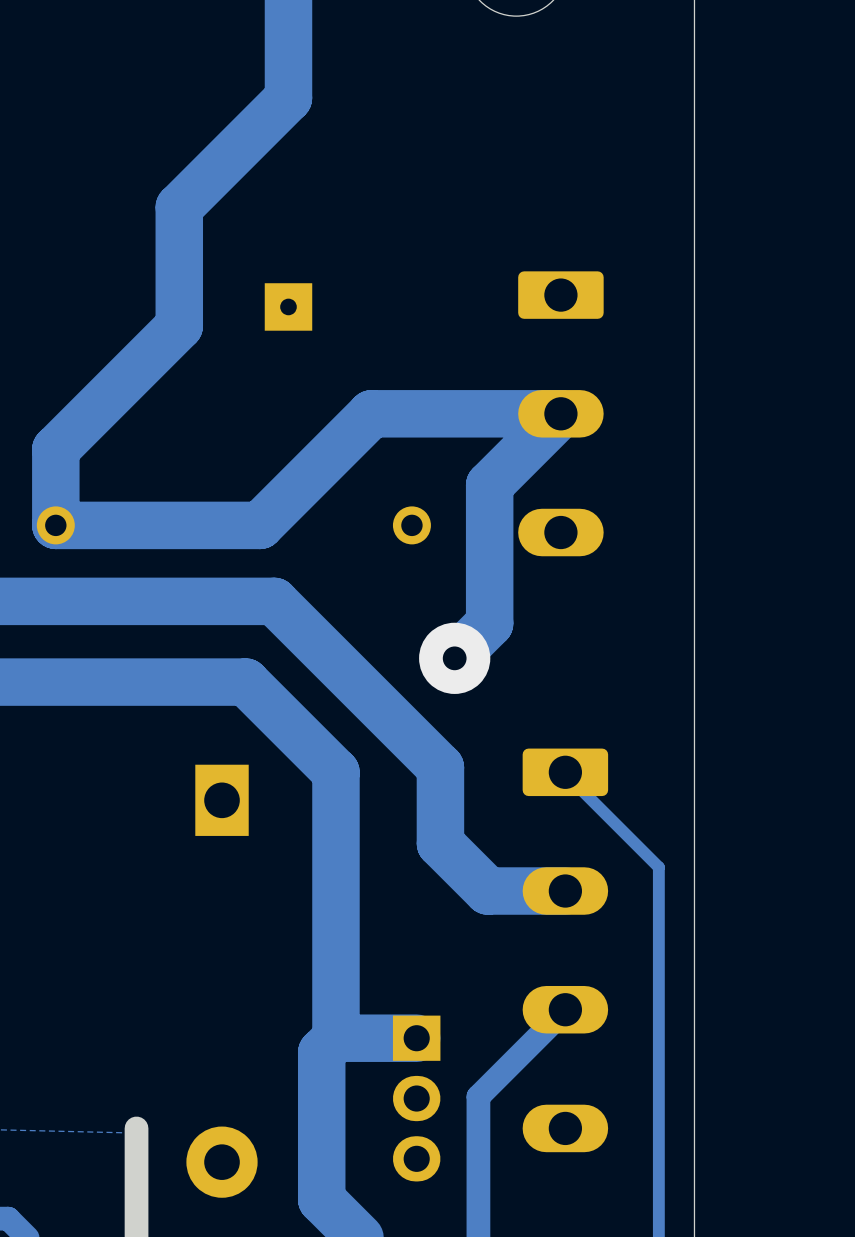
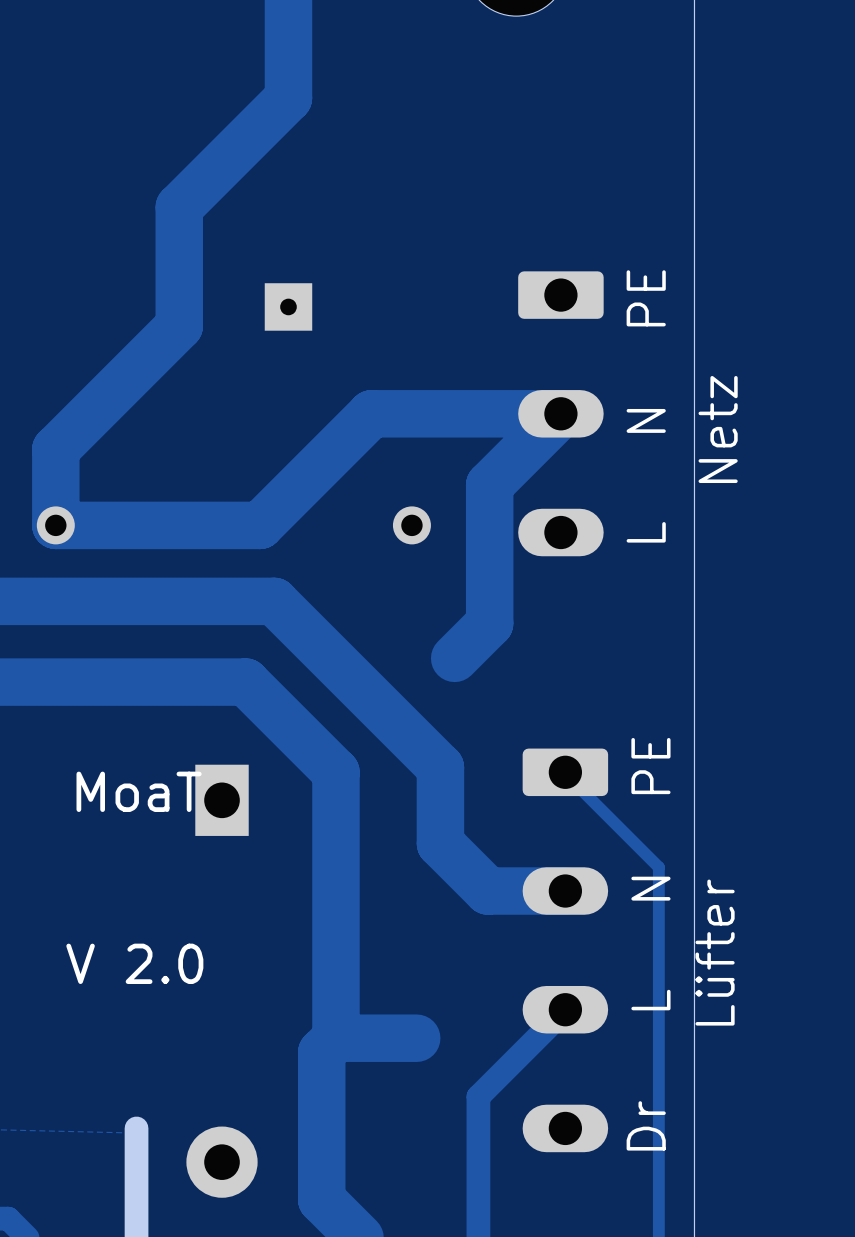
text: none -> PE (646, 298)
text: none -> N (646, 420)
text: none -> Netz (718, 429)
text: none -> L (646, 532)
via: (454, 658) -> none
text: none -> PE (650, 766)
text: none -> MoaT (139, 791)
text: none -> N (650, 888)
text: none -> Lüfter (715, 952)
text: none -> V 2.0 (134, 963)
text: none -> L (650, 1000)
part: (416, 1098) -> none
text: none -> Dr (646, 1125)

